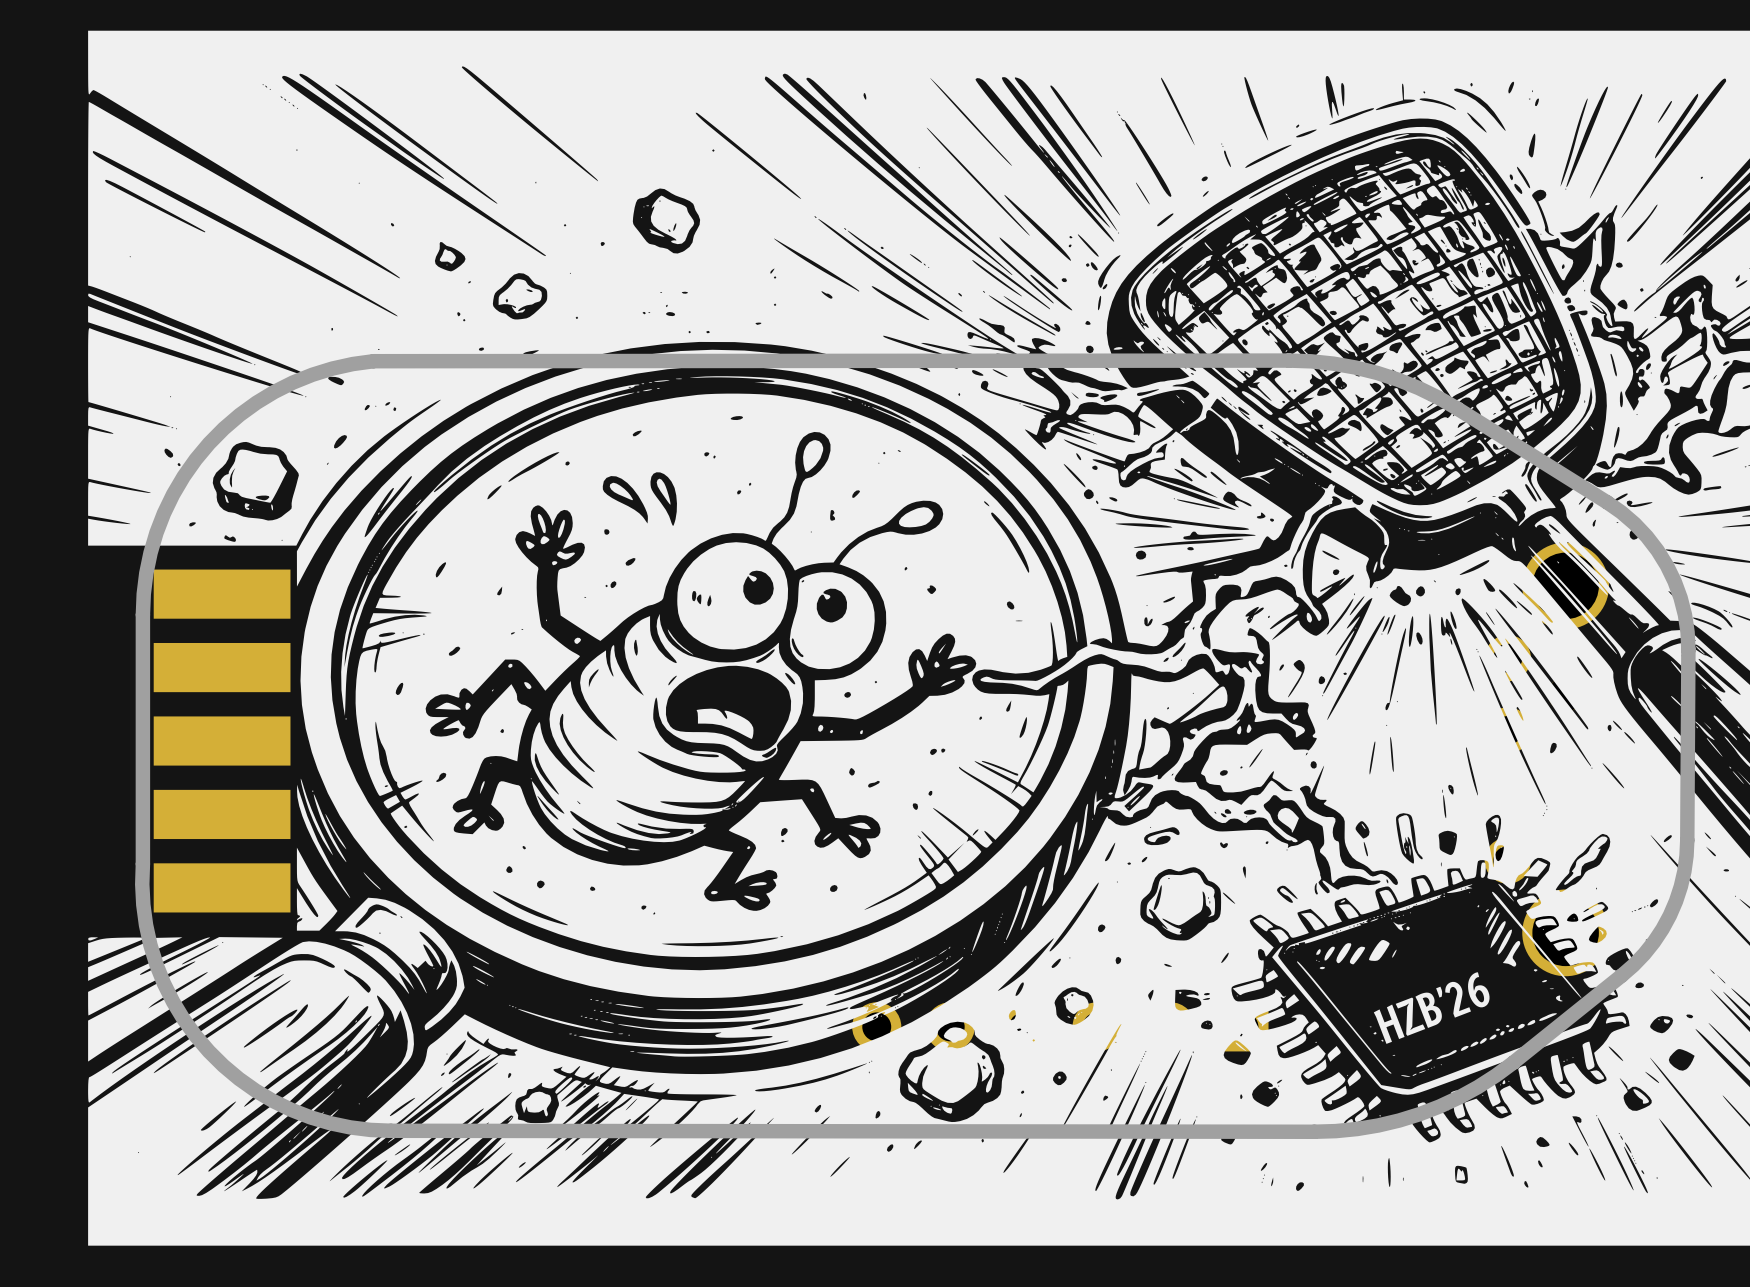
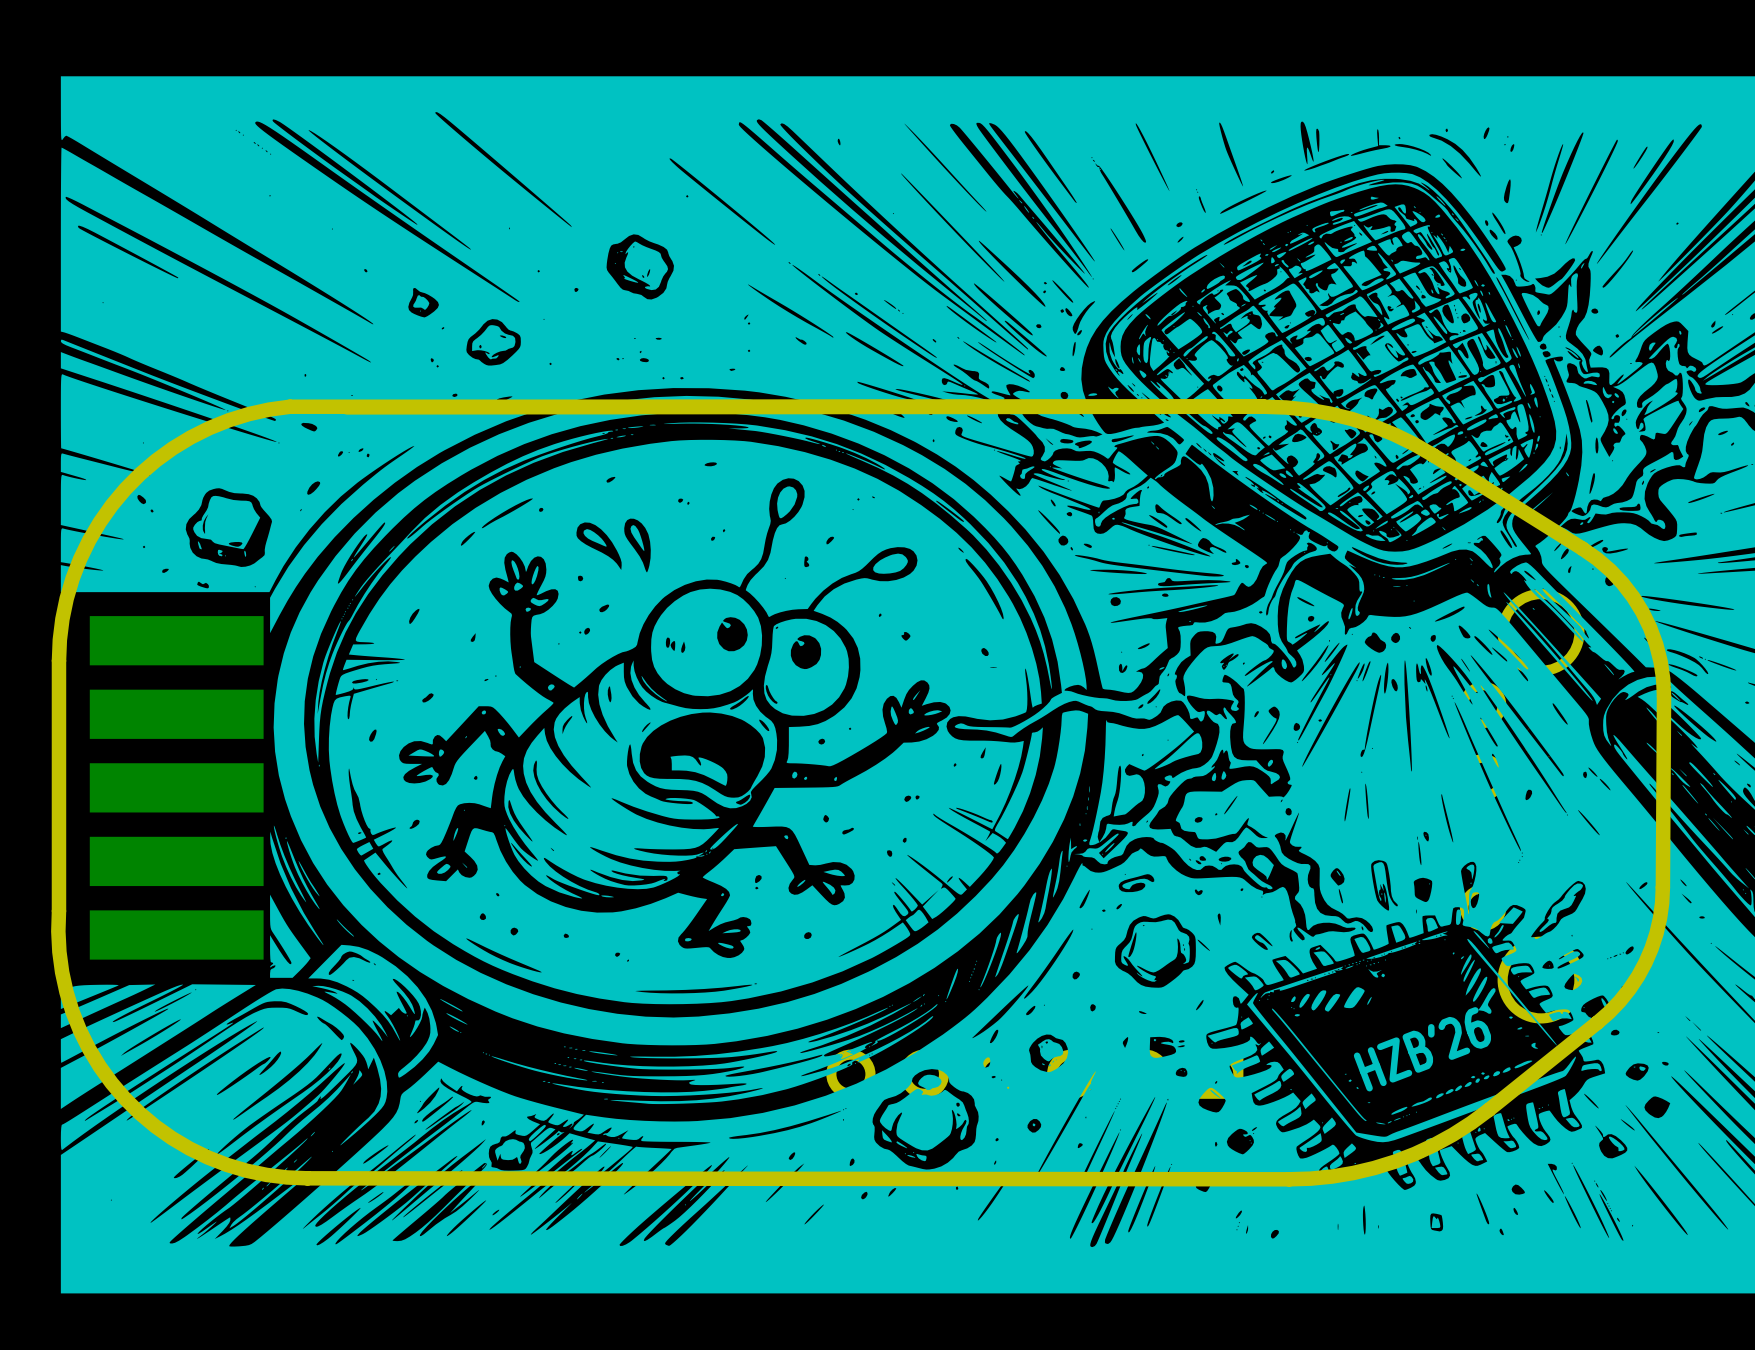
board edge: (373, 361) (332, 368) (293, 382) (256, 402) (223, 428) (195, 459) (173, 494) (156, 532) (146, 573) (142, 614) (142, 884) (146, 925) (156, 964) (173, 1001) (195, 1035) (223, 1065) (239, 1078) (273, 1101) (310, 1117) (350, 1127) (370, 1129) (1314, 1131) -> (1263, 406) (289, 406) (248, 414) (209, 428) (190, 437) (155, 460) (125, 489) (99, 522) (89, 540) (72, 578) (62, 619) (58, 660) (58, 931) (62, 972) (72, 1011) (89, 1049) (99, 1066) (125, 1098) (155, 1126) (189, 1148) (227, 1164) (266, 1174) (307, 1178) (1289, 1179)
part footprint: [153, 569, 291, 913] -> [89, 616, 264, 960]

